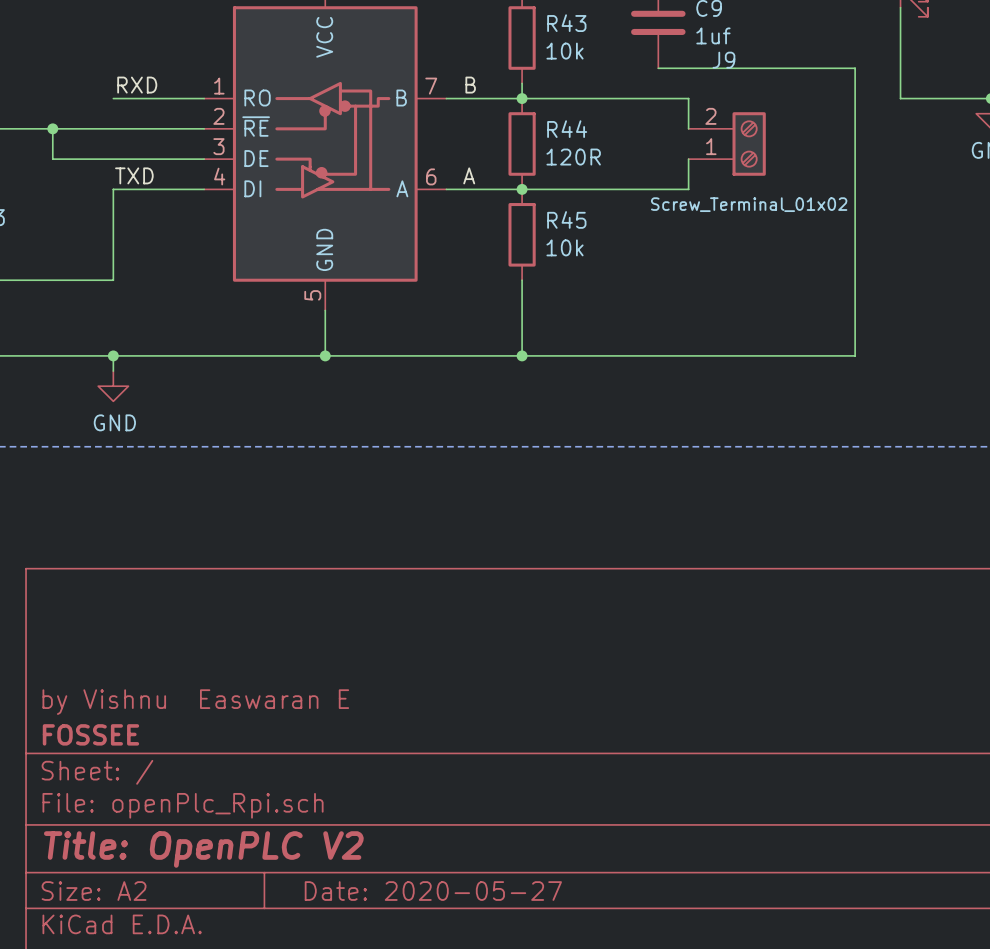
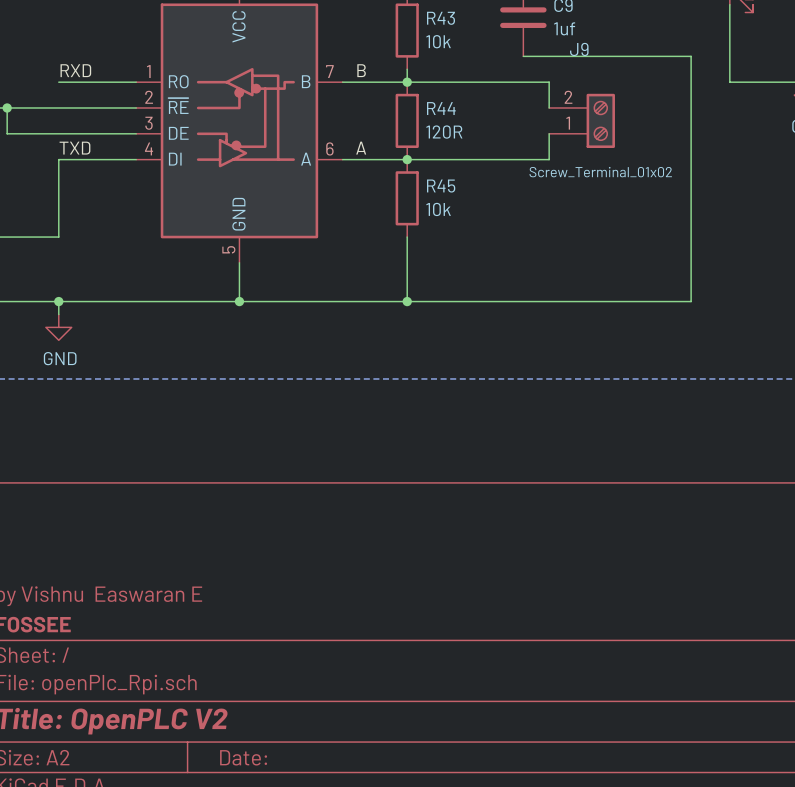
title block: Date: 2020-05-27 (433, 891) -> Date: (243, 757)

